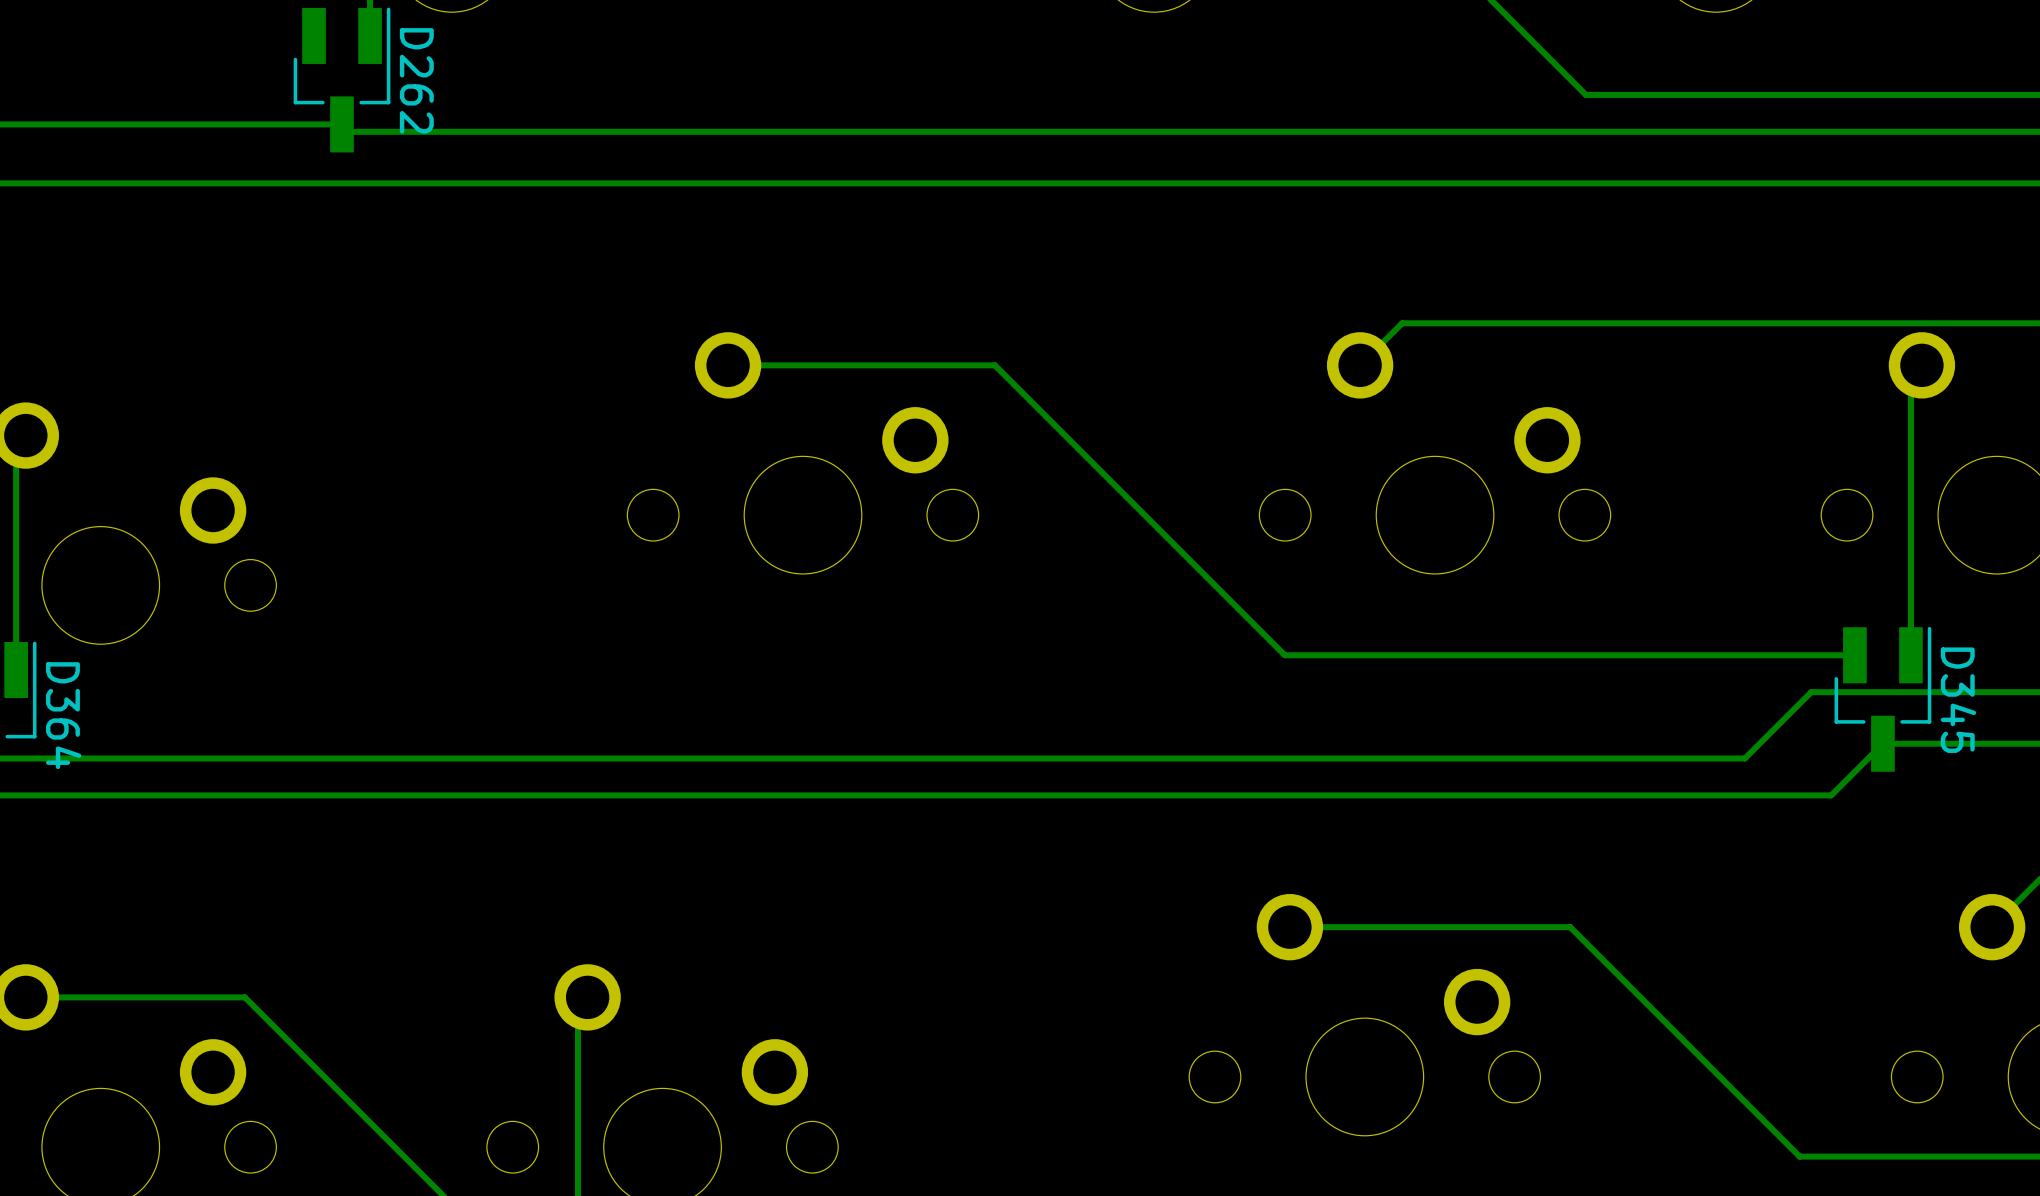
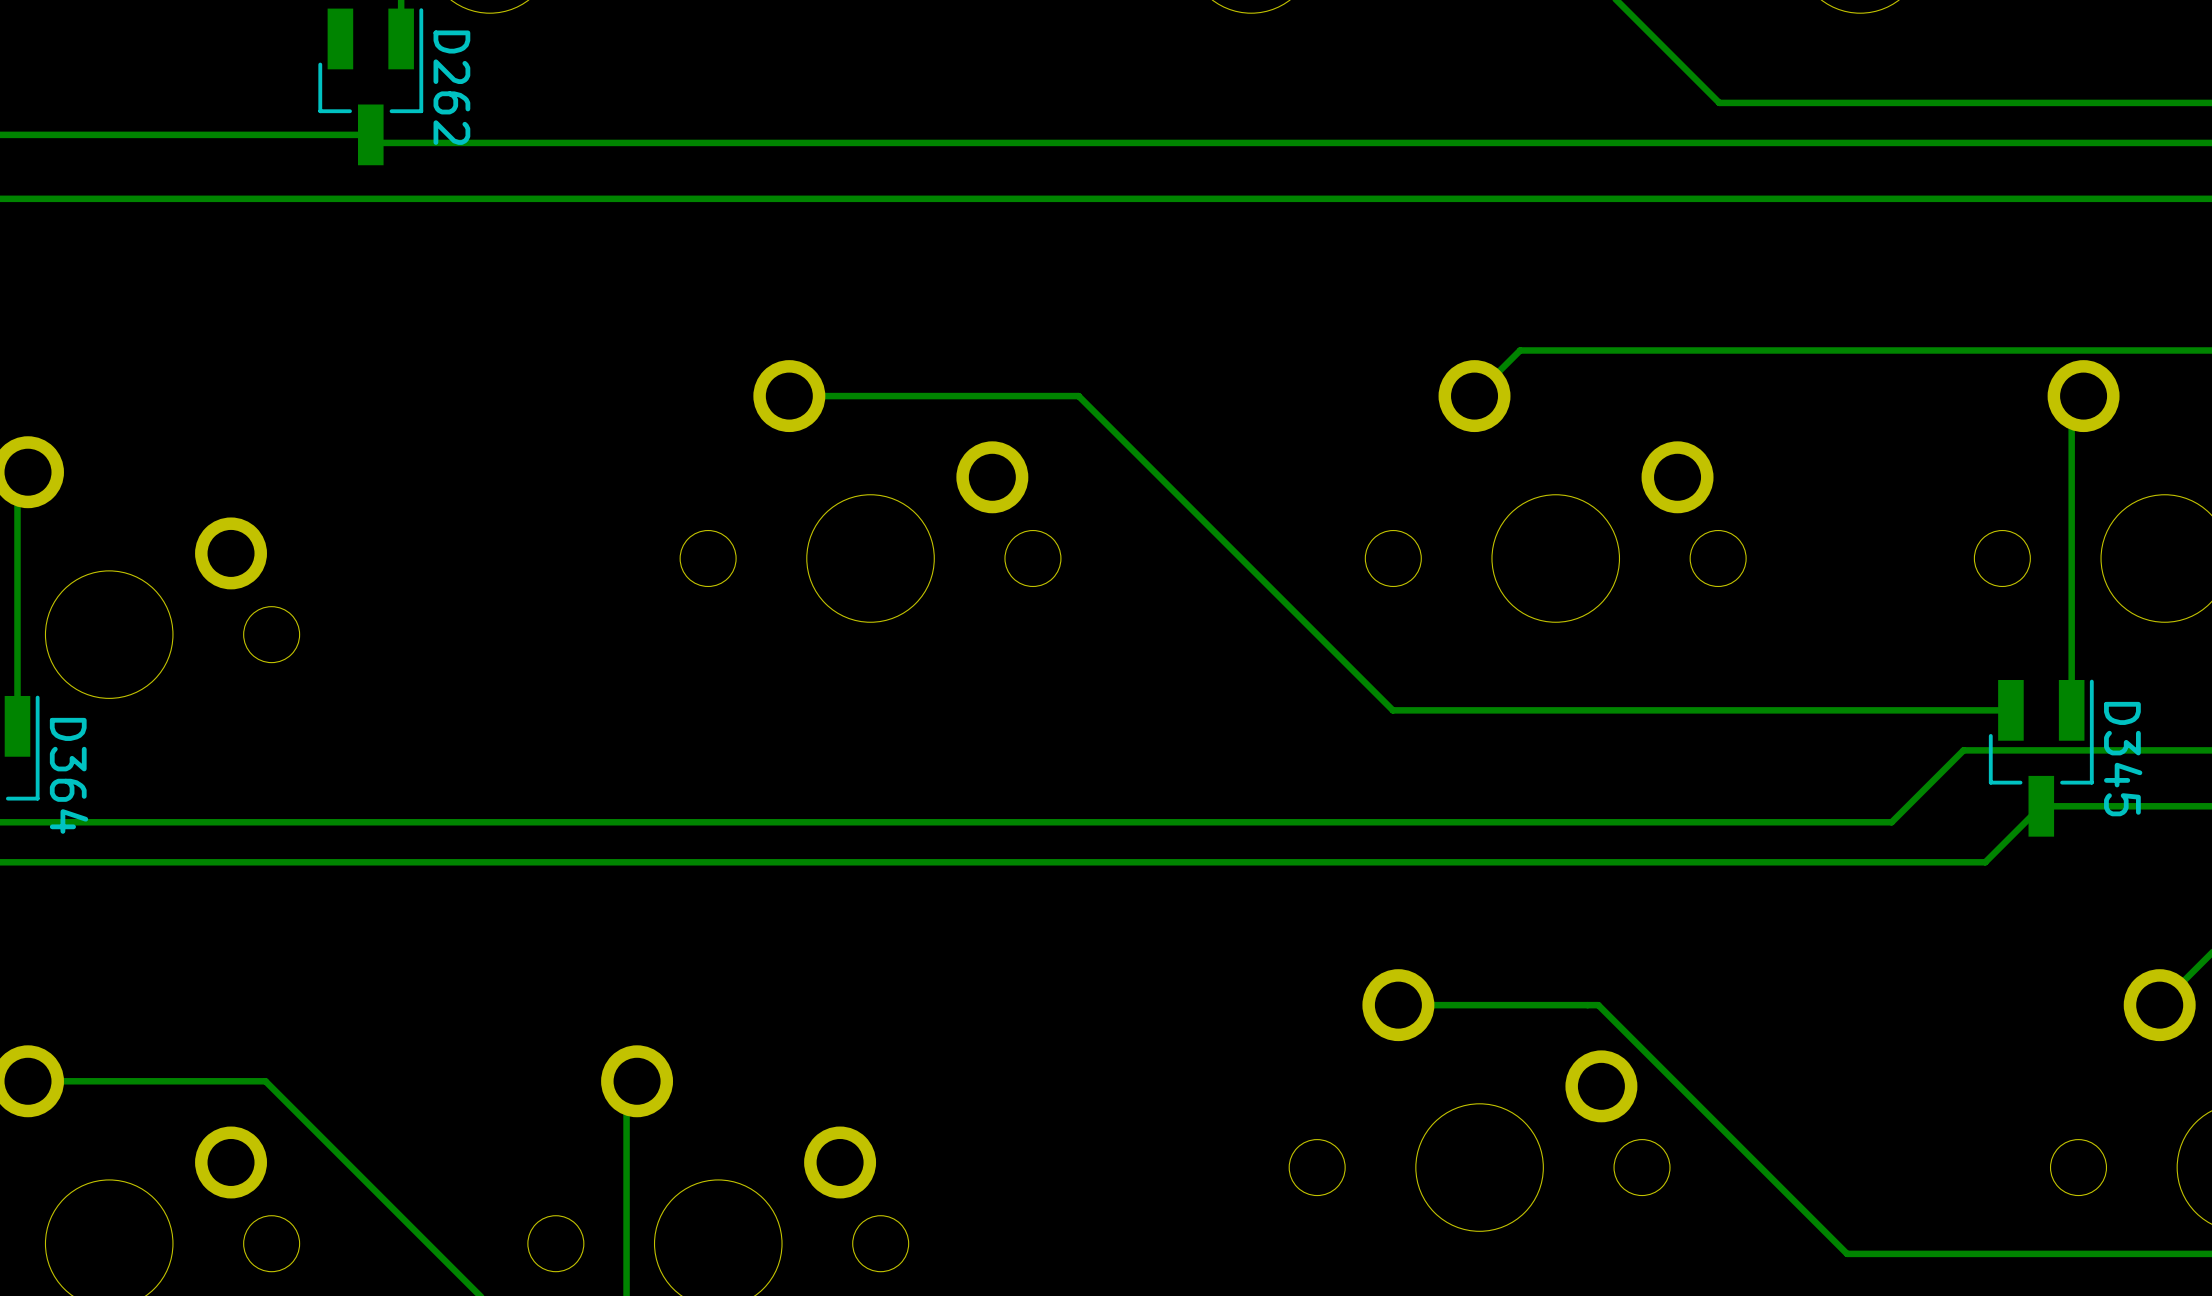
track: (1474, 927) (1570, 927) (1799, 1156) -> (1598, 1005) (1847, 1253) (1951, 1253)

